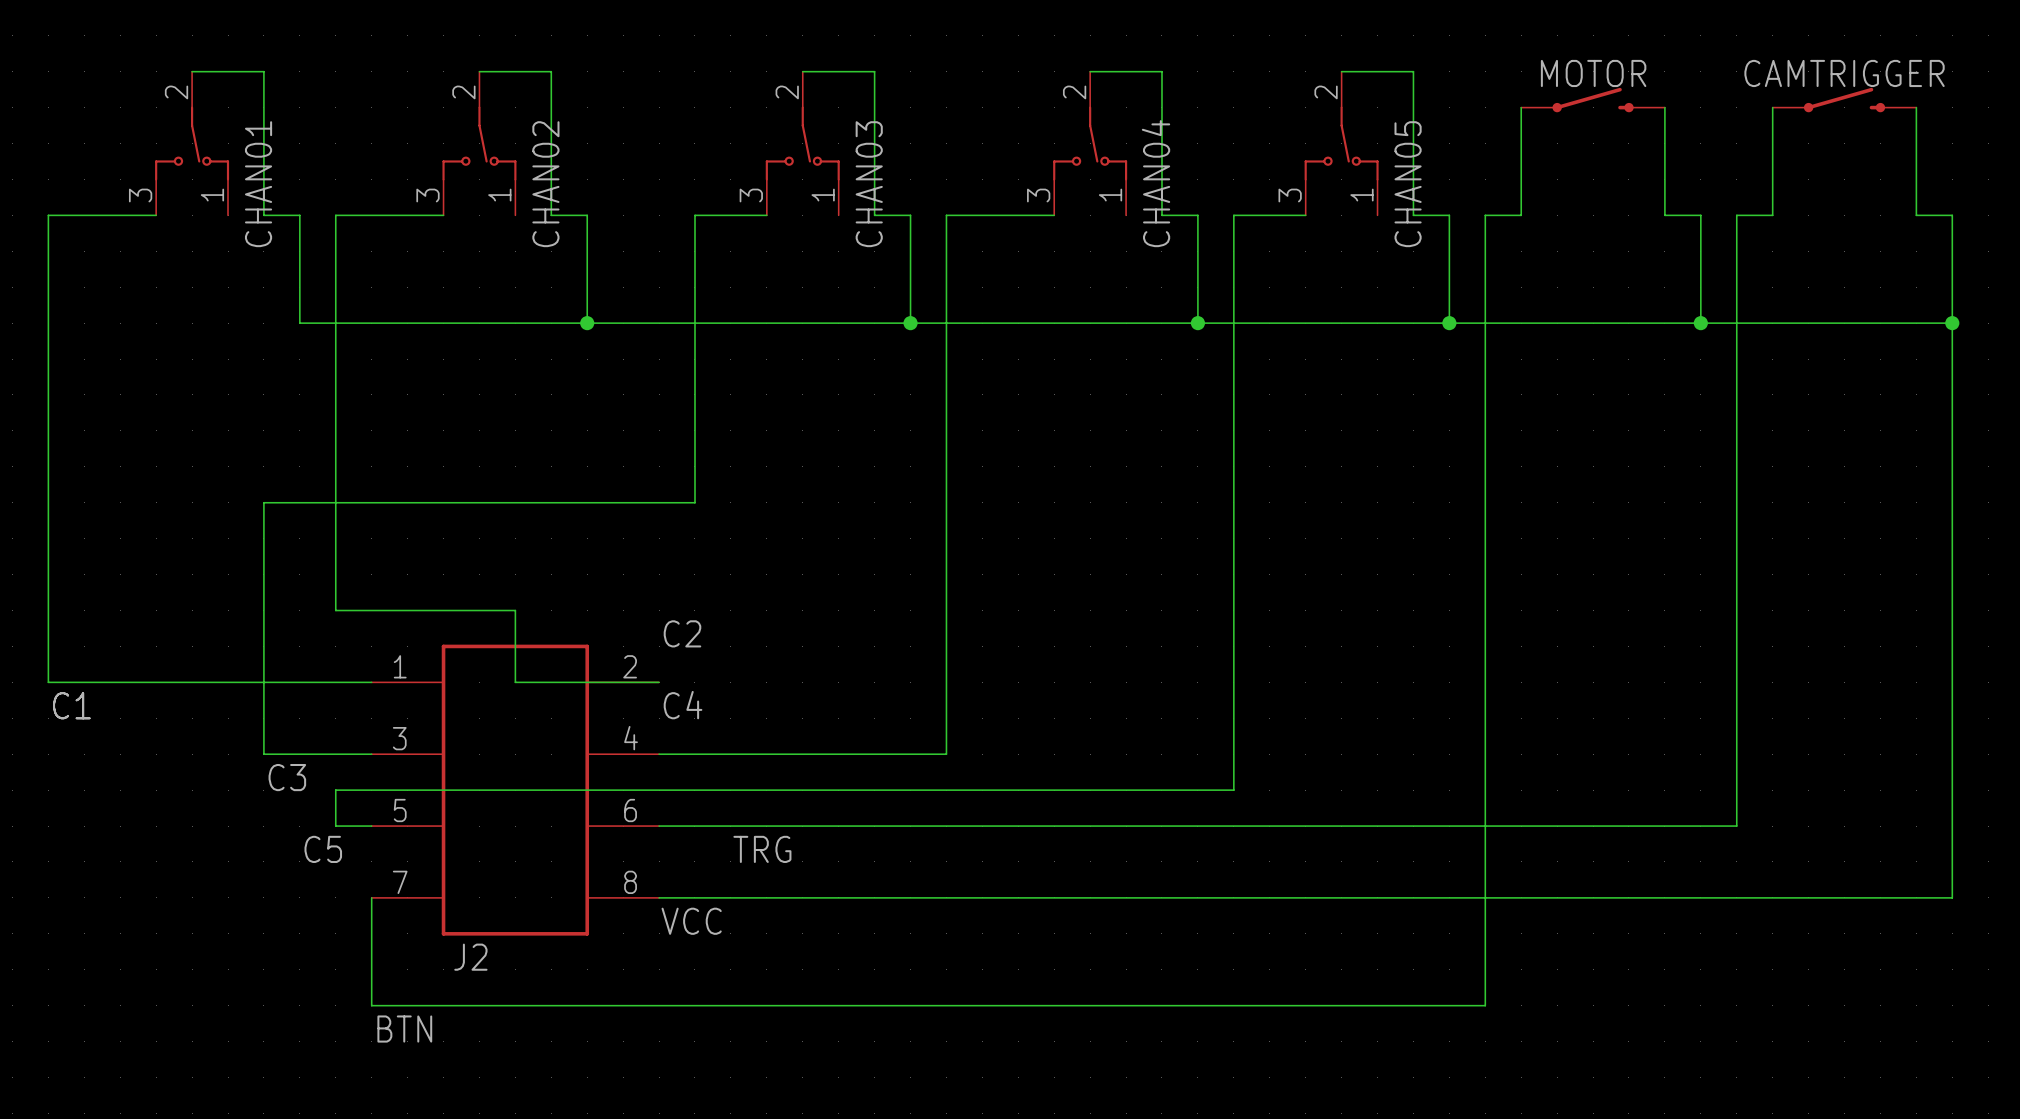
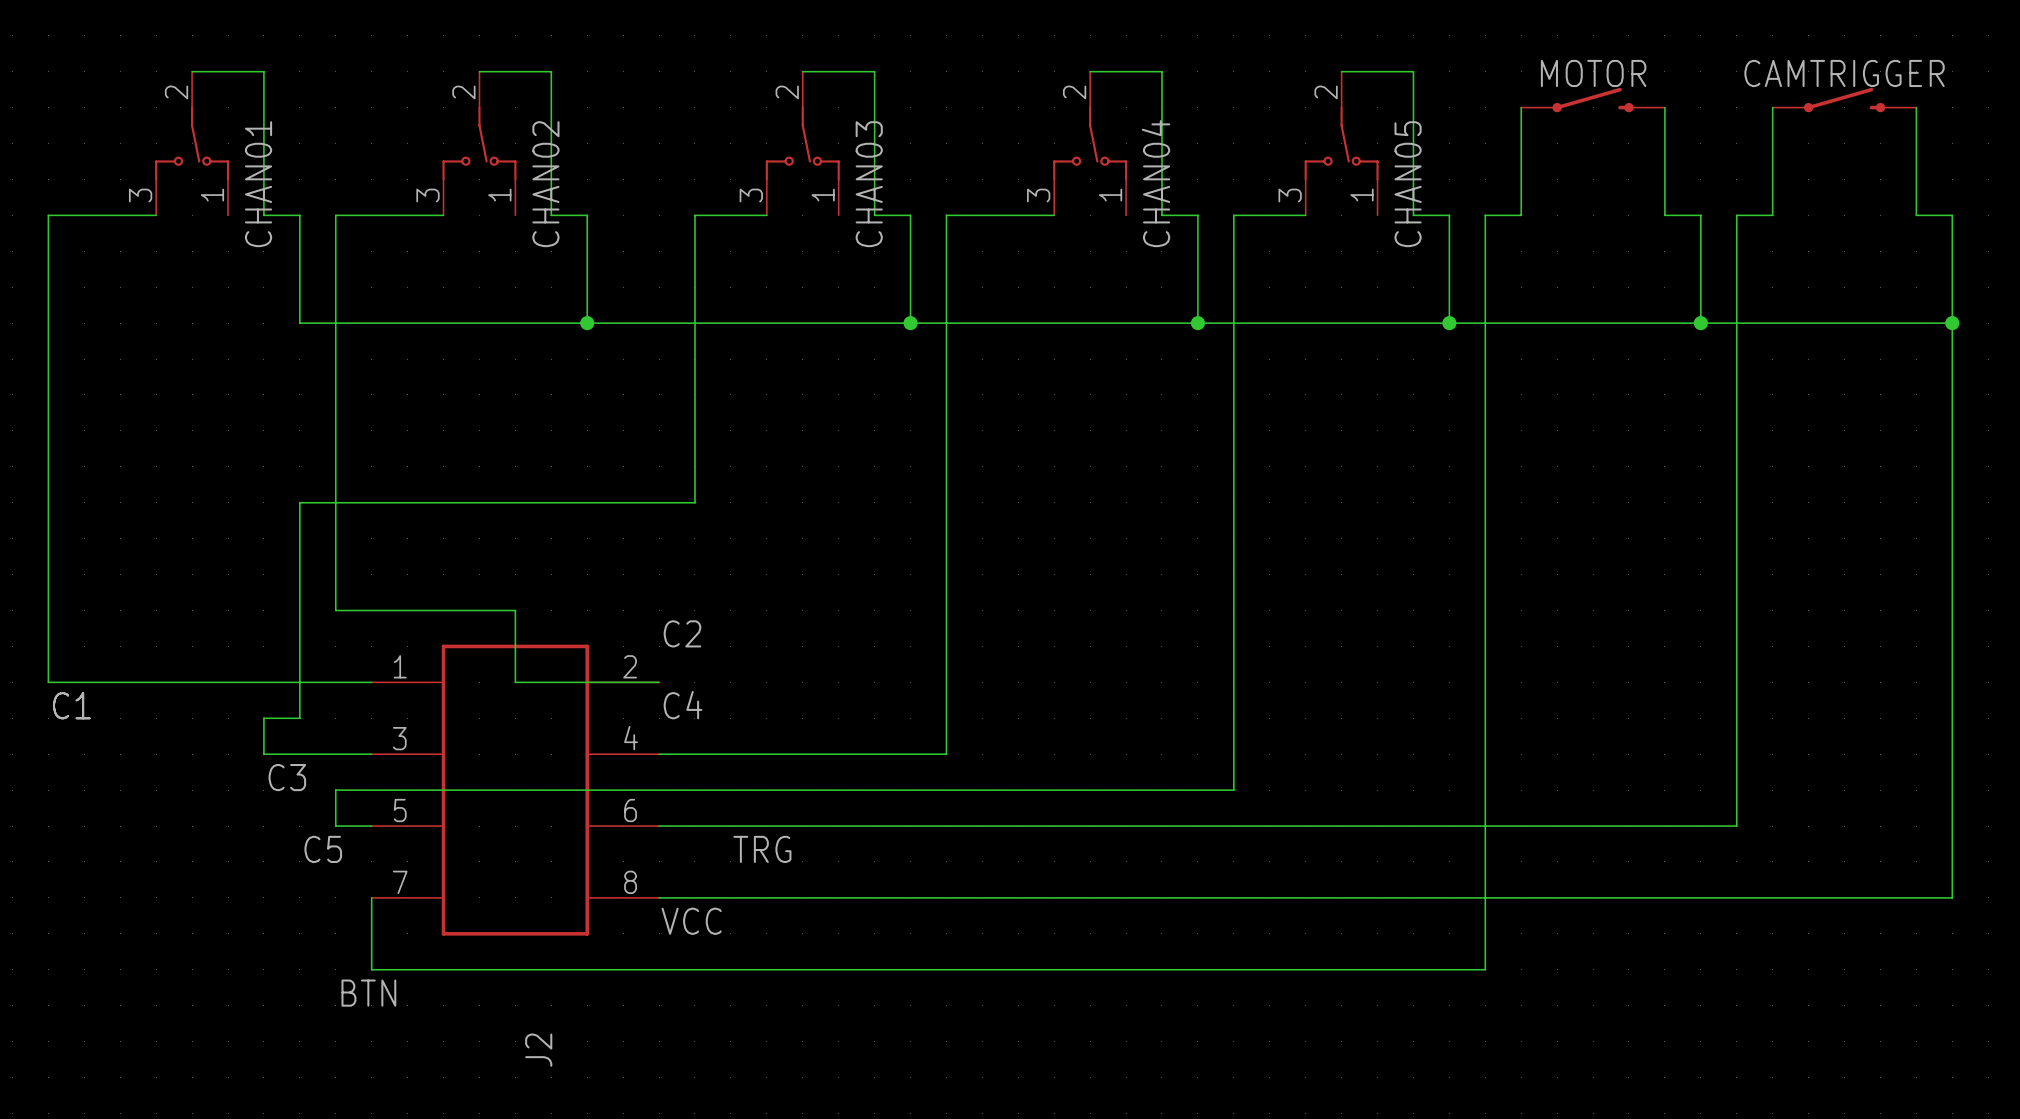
wire: (299, 502) (263, 502) (263, 718) -> (299, 502) (299, 718) (263, 718)
J2 name rotation: 0° (470, 957) -> 90° counterclockwise (538, 1050)
J2 name position: J2 (470, 957) -> J2 (538, 1050)
wire: (371, 969) (371, 1005) (1485, 1005) (1485, 969) -> (371, 969) (1485, 969)
label position: BTN (404, 1029) -> BTN (368, 993)

